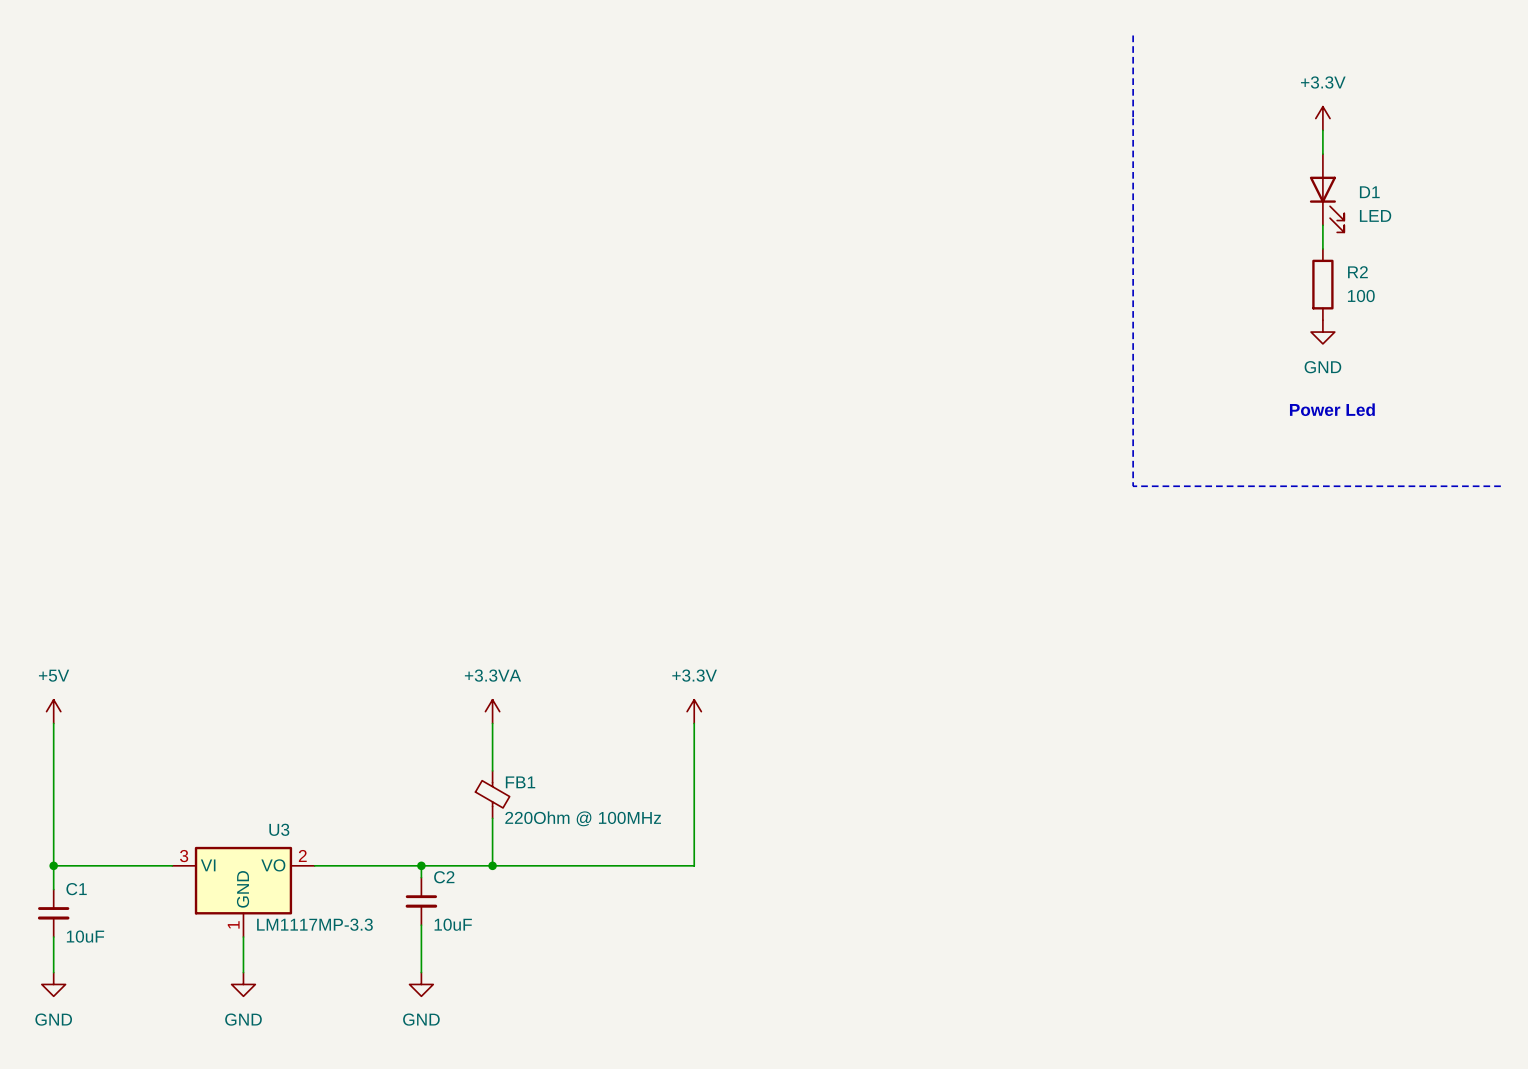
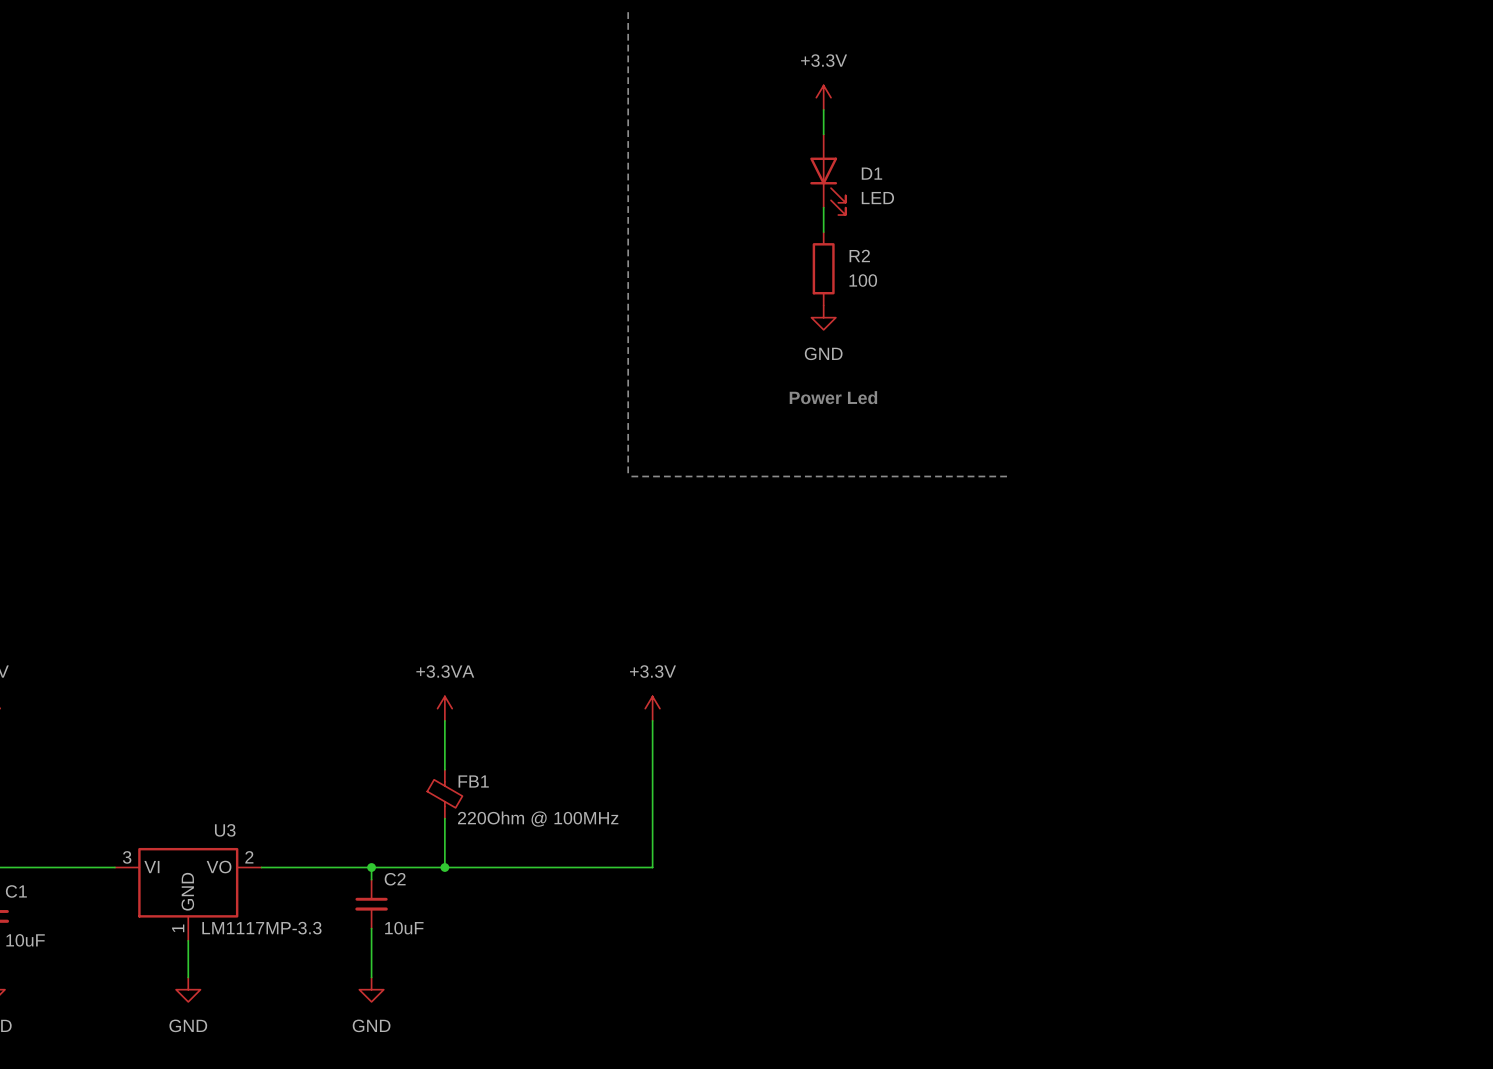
line: none -> (628, 12) (628, 476) (1006, 476)
line: (1133, 35) (1133, 486) (1500, 486) -> none
power symbol: none -> +3.3V (823, 97)
power symbol: +3.3V (1322, 118) -> none
wire: none -> (823, 109) (823, 134)
wire: (1322, 130) (1322, 154) -> none
D1 position: (1327, 193) -> (827, 174)
wire: none -> (823, 207) (823, 232)
wire: (1322, 225) (1322, 249) -> none
R2 position: (1322, 284) -> (823, 268)
power symbol: none -> GND (823, 317)
power symbol: GND (1322, 332) -> none
text: none -> Power Led (833, 397)
text: Power Led (1332, 409) -> none

